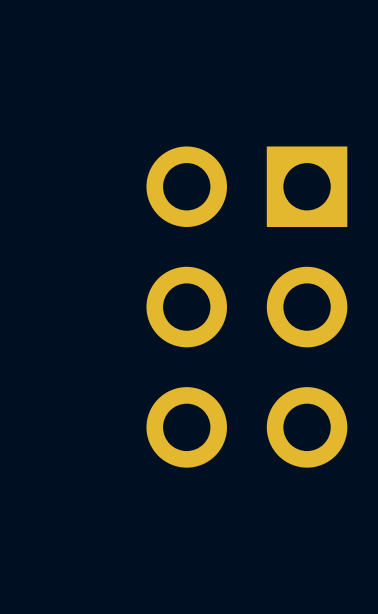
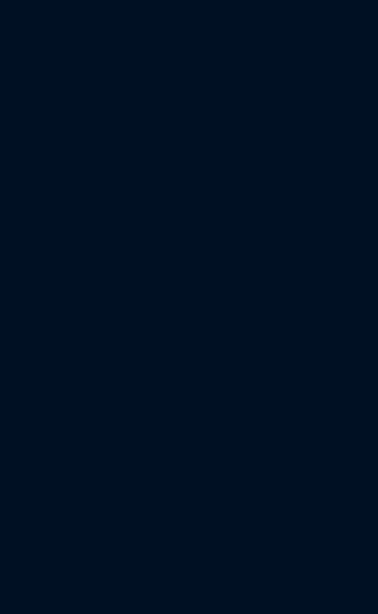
part: (246, 307) -> none

